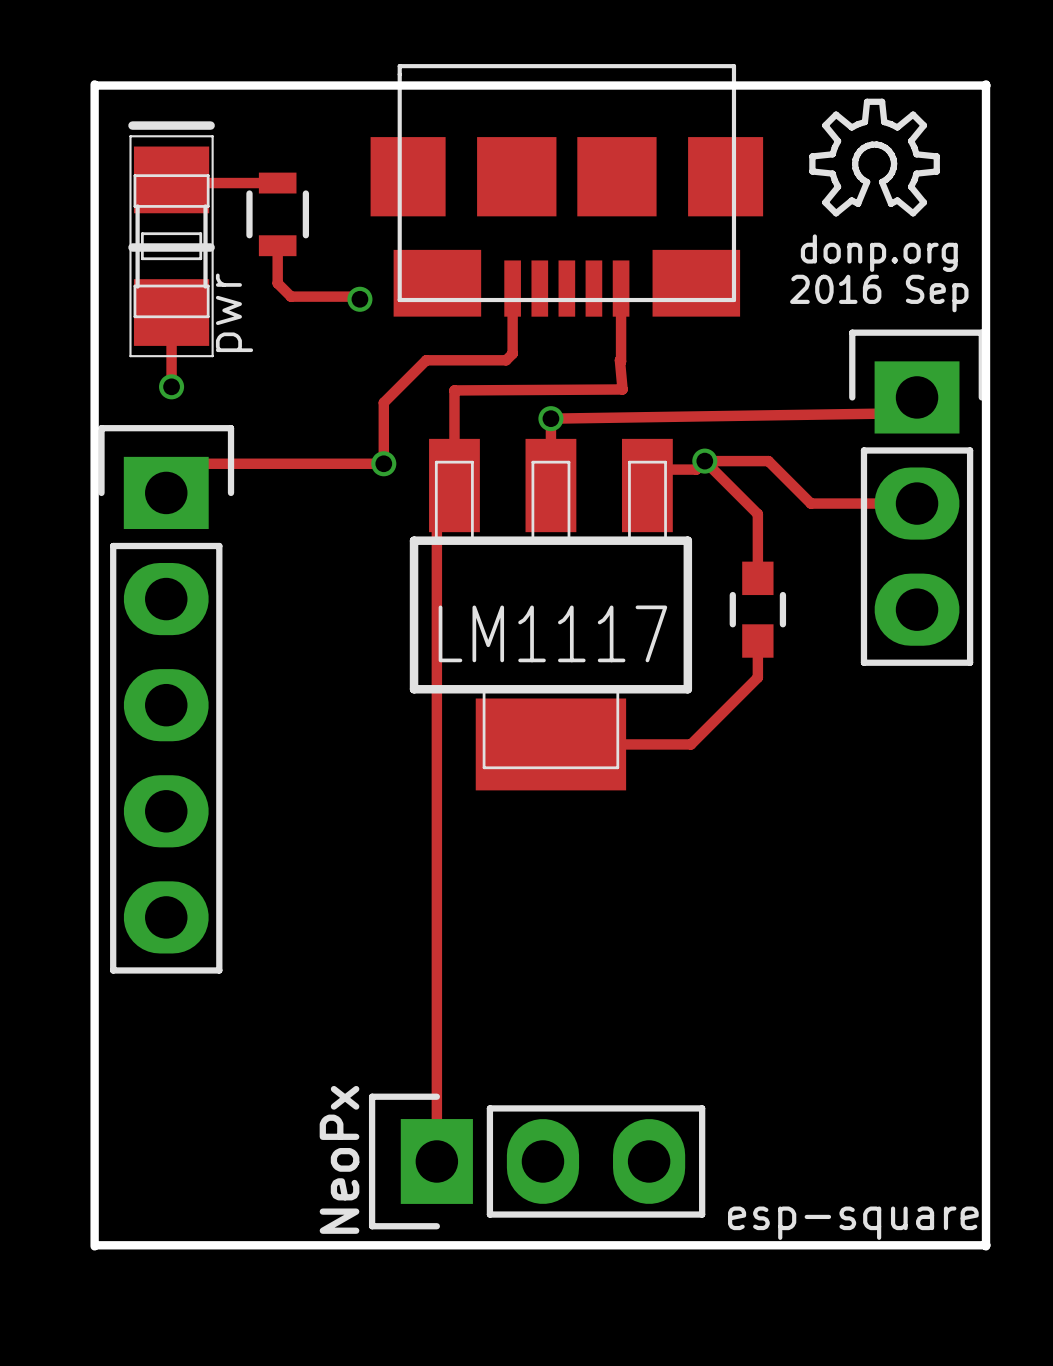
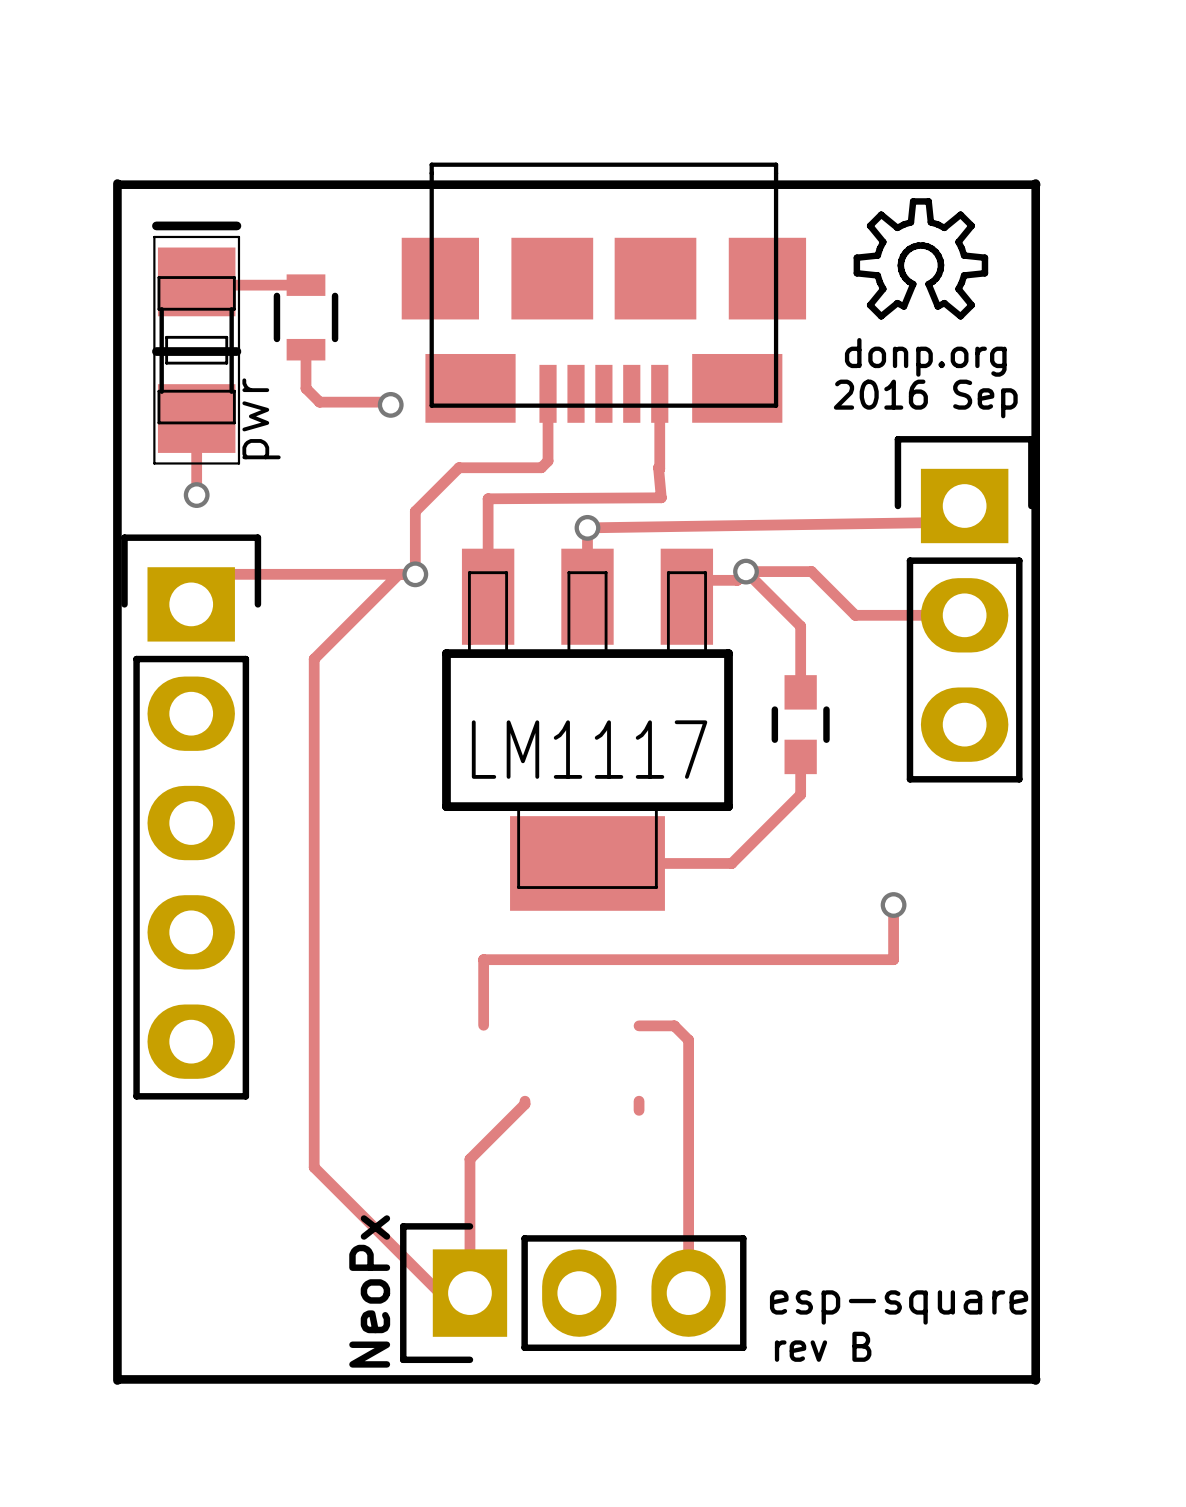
track: none -> (398, 574) (314, 659) (314, 1167) (439, 1293) (469, 1293)
track: (436, 527) (436, 1031) -> (525, 1101) (525, 1104) (469, 1159)
track: none -> (893, 905) (893, 959) (483, 959) (483, 1025)
via: none -> (893, 905)
track: none -> (639, 1025) (674, 1025) (688, 1040) (688, 1293)
track: none -> (639, 1101) (639, 1110)
text: none -> rev B (823, 1346)
text position: esp-square (853, 1223) -> esp-square (899, 1307)

